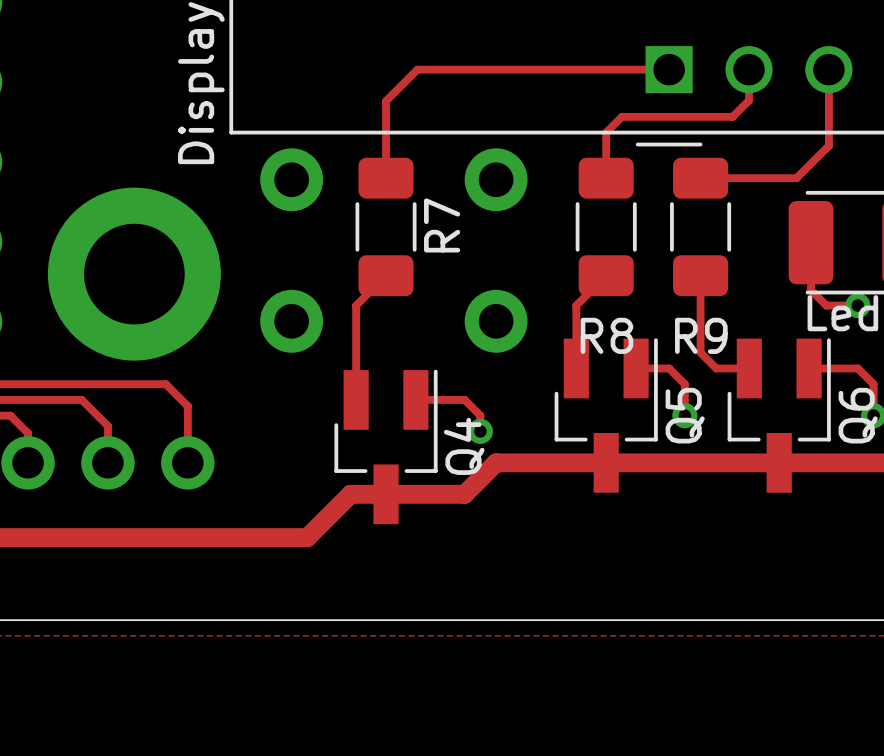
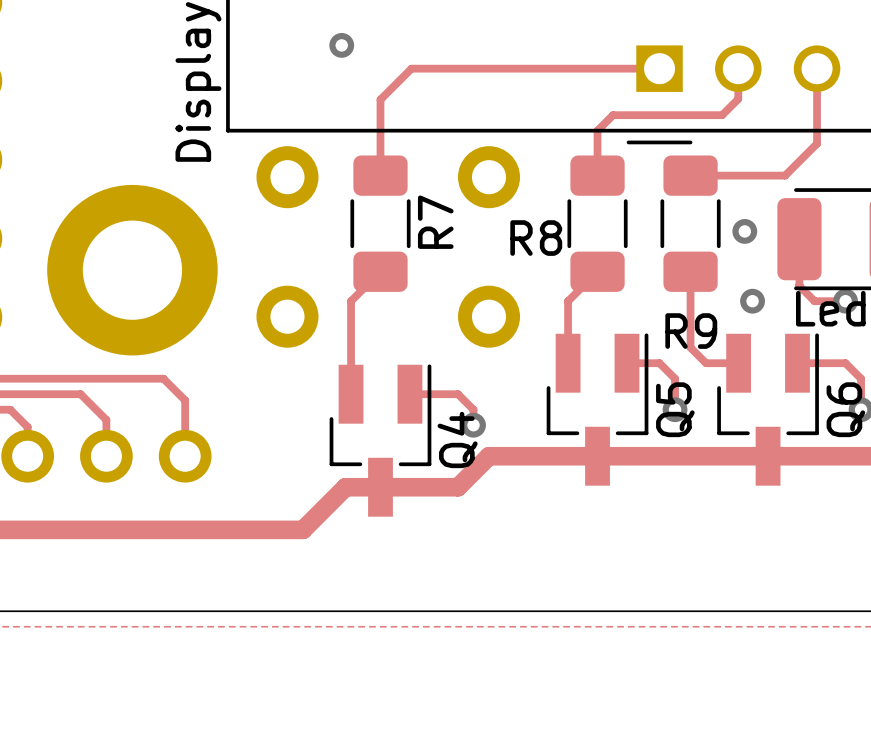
via: none -> (341, 45)
via: none -> (744, 231)
via: none -> (752, 301)
R8 name position: R8 (606, 335) -> R8 (536, 238)

